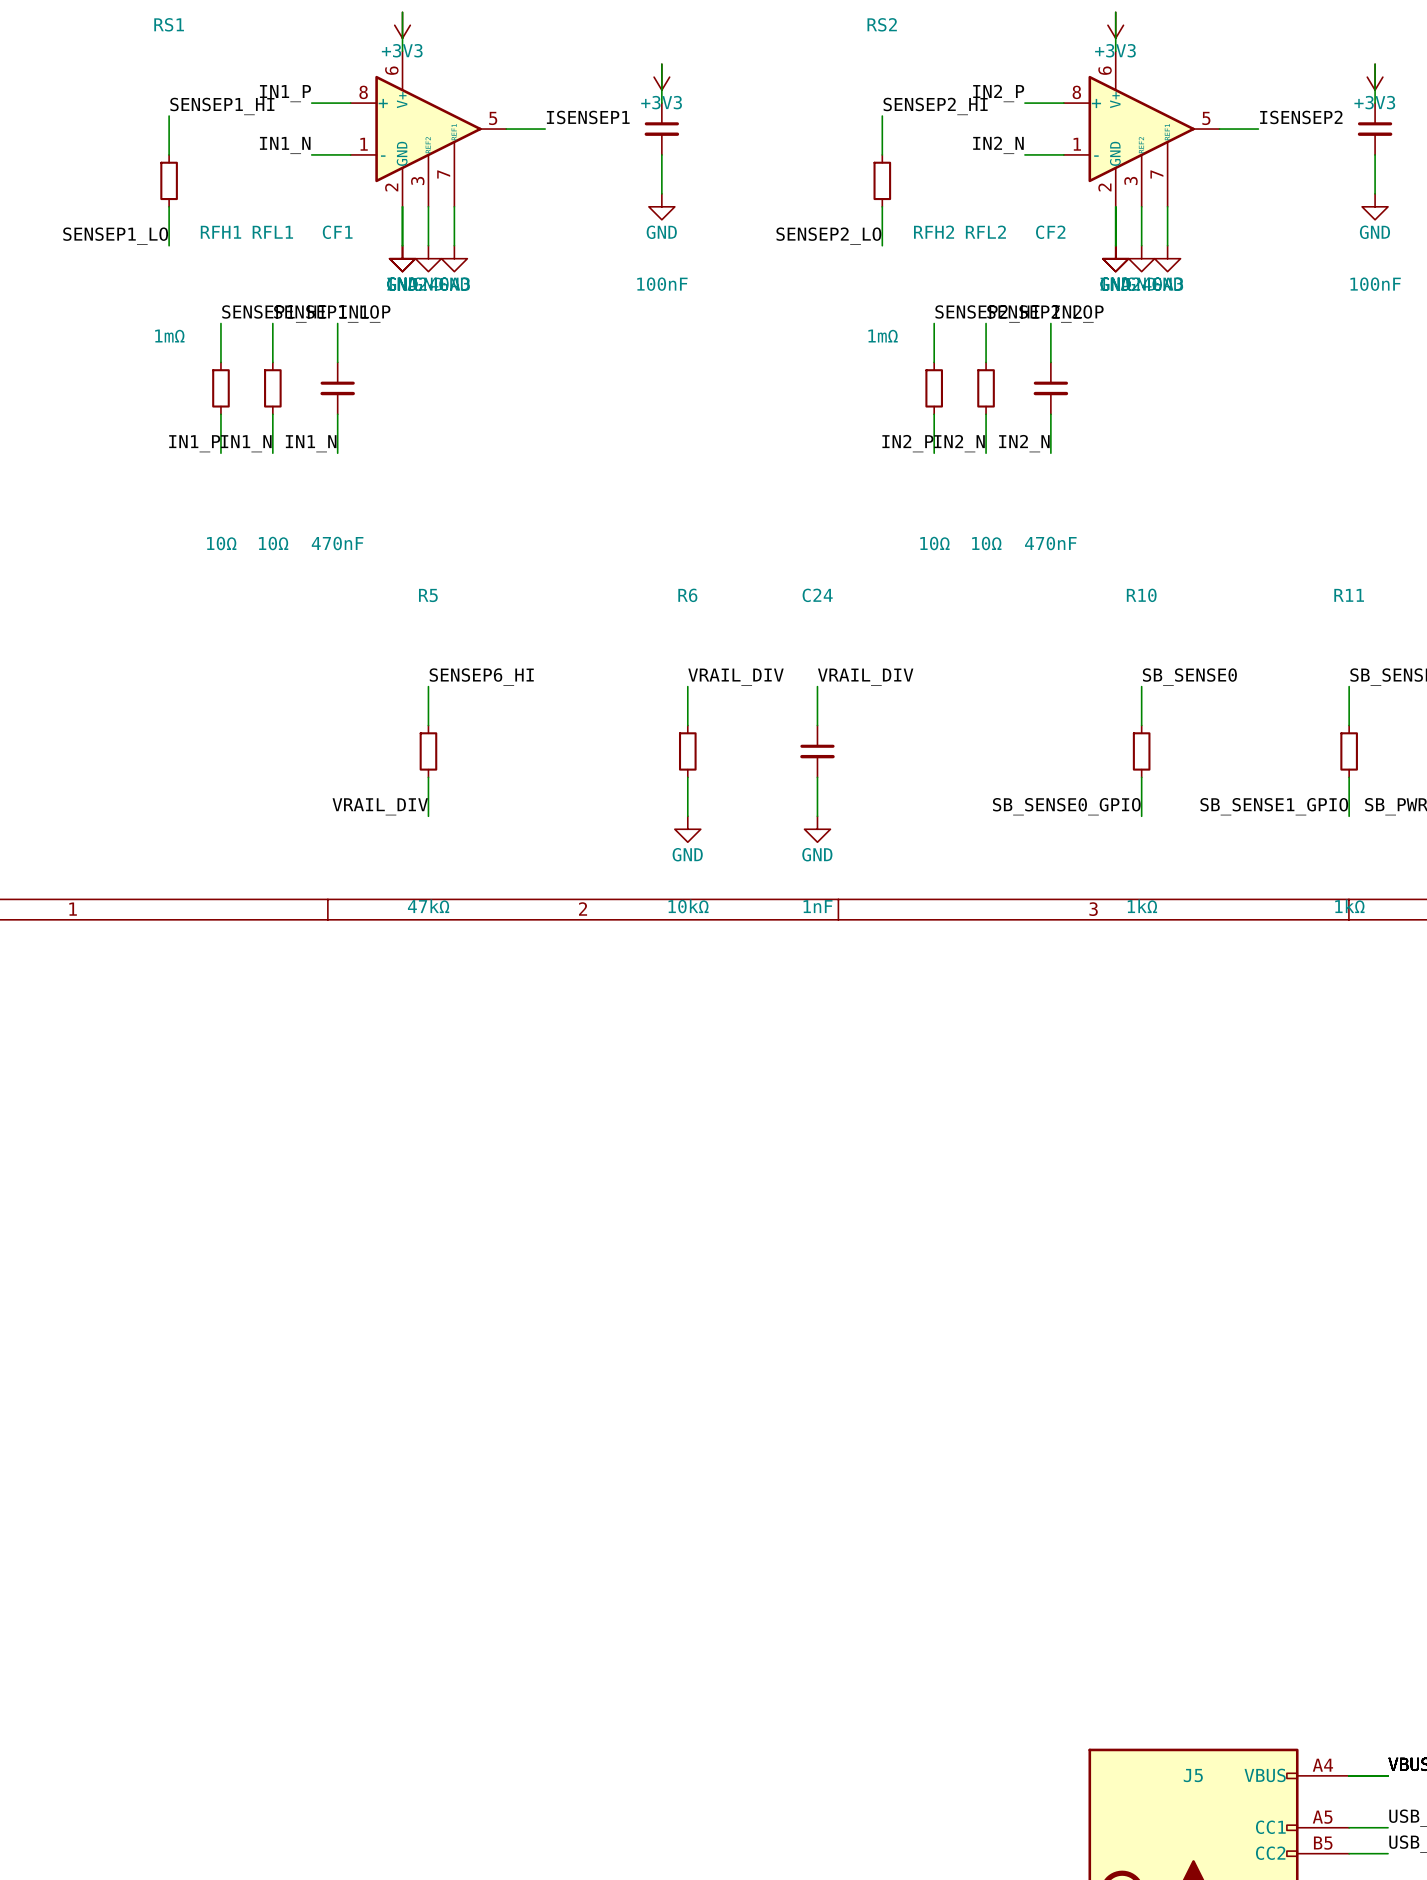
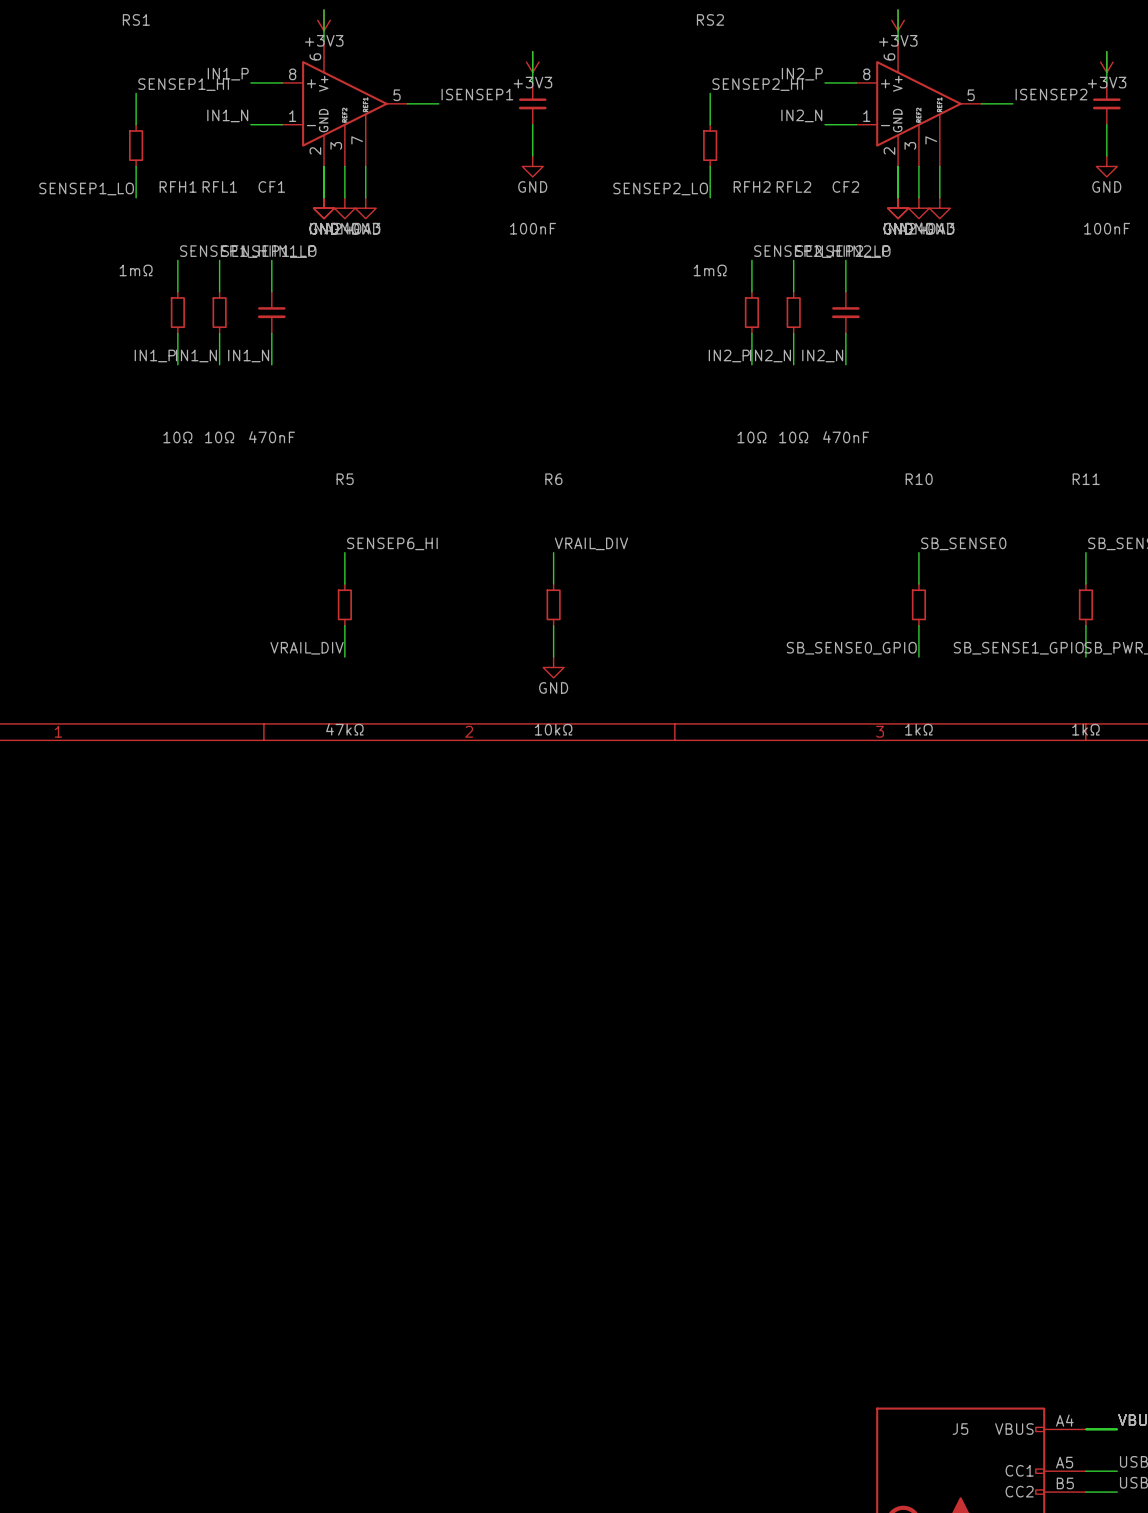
label: VRAIL_DIV (865, 677) -> none
wire: (817, 686) (817, 725) -> none
C24: 1nF (817, 751) -> none
wire: (817, 777) (817, 816) -> none
power symbol: GND (817, 829) -> none

